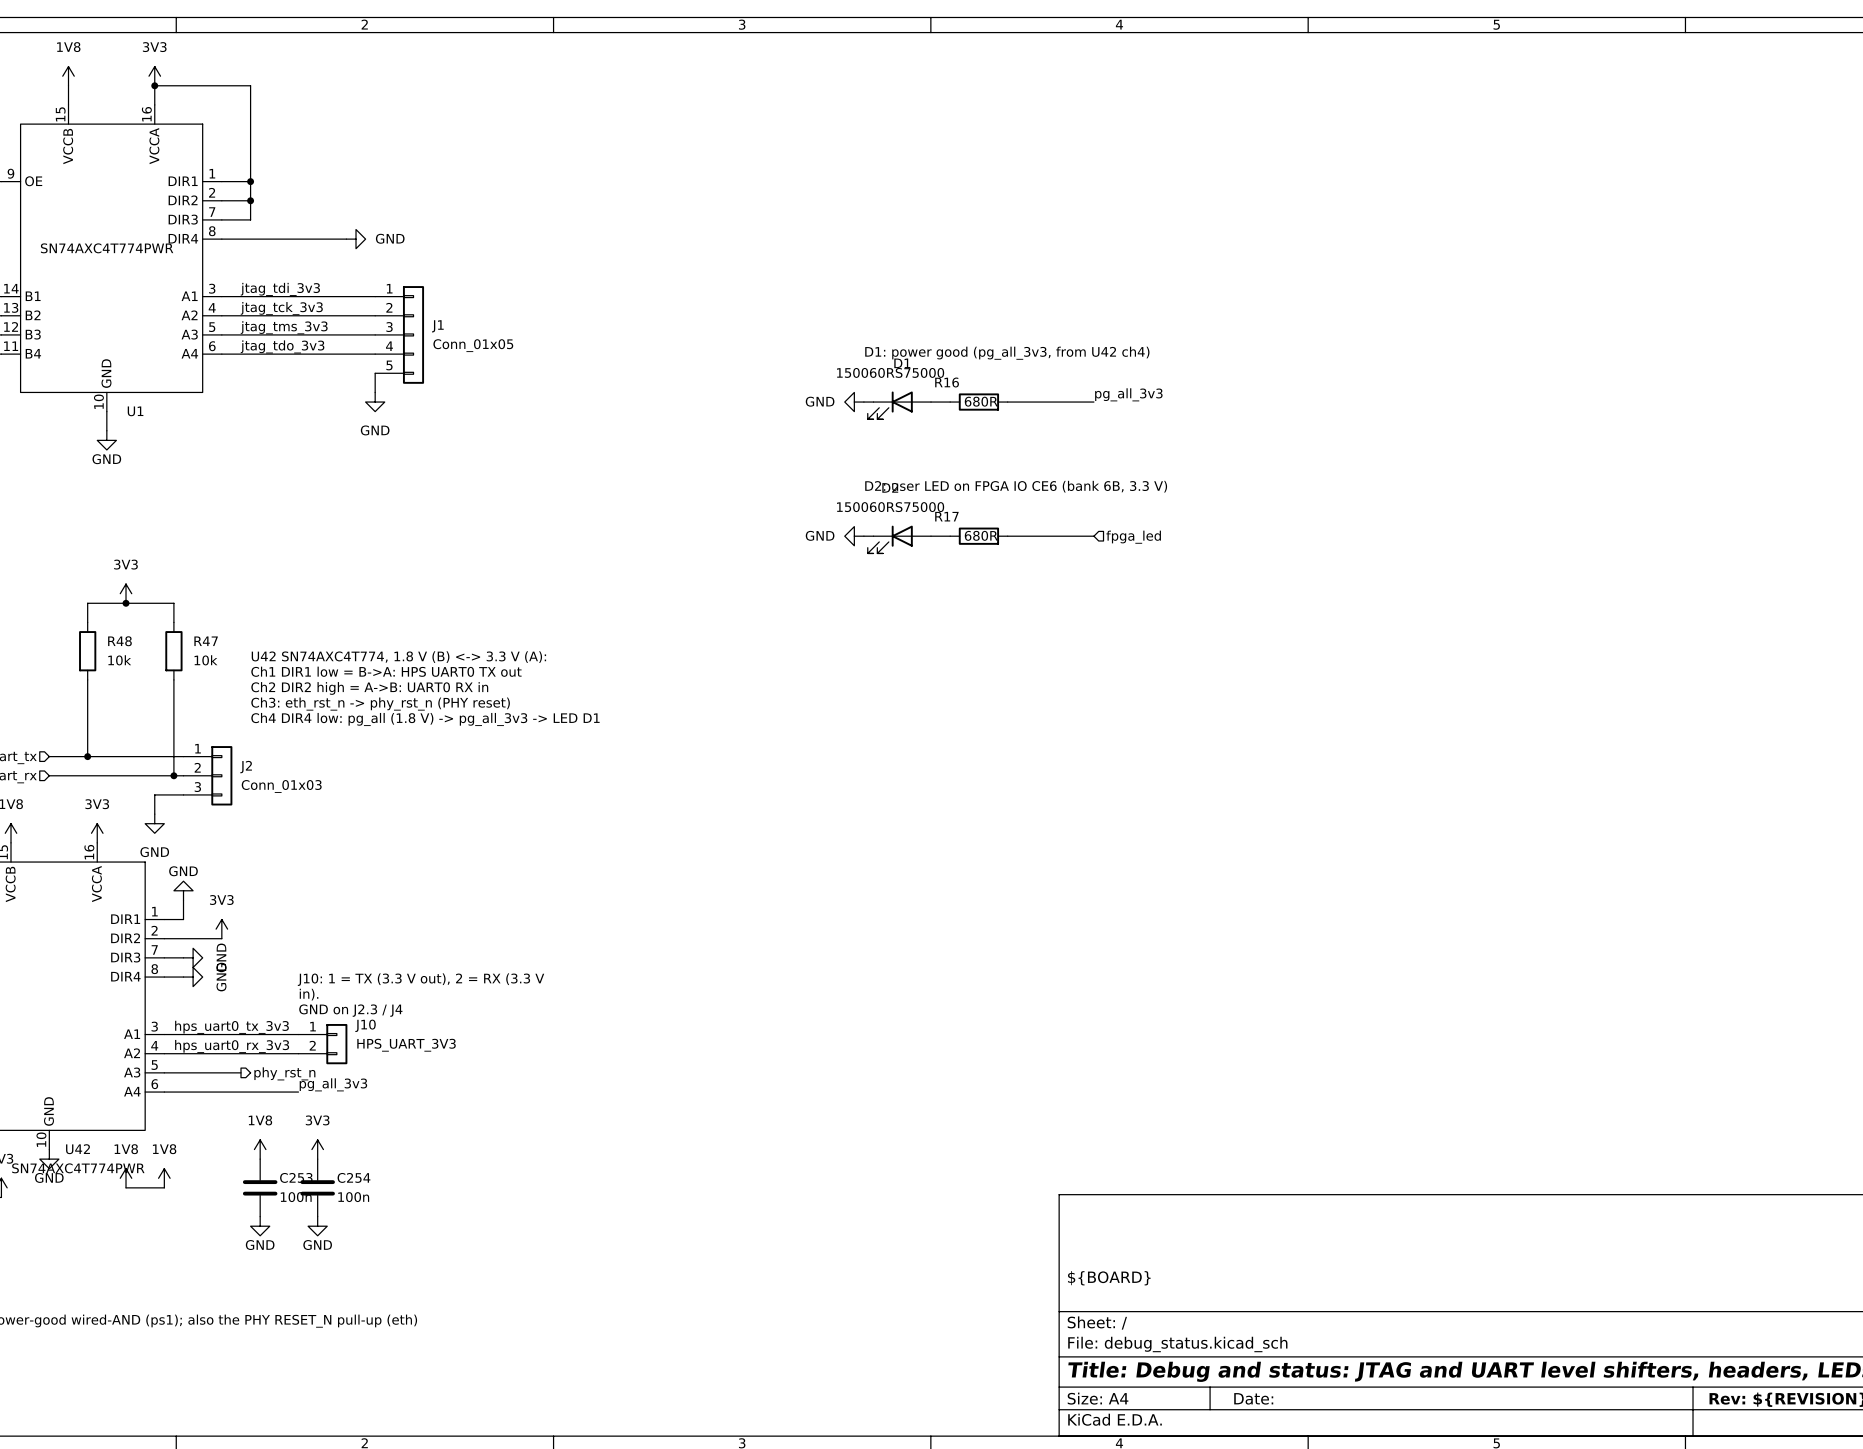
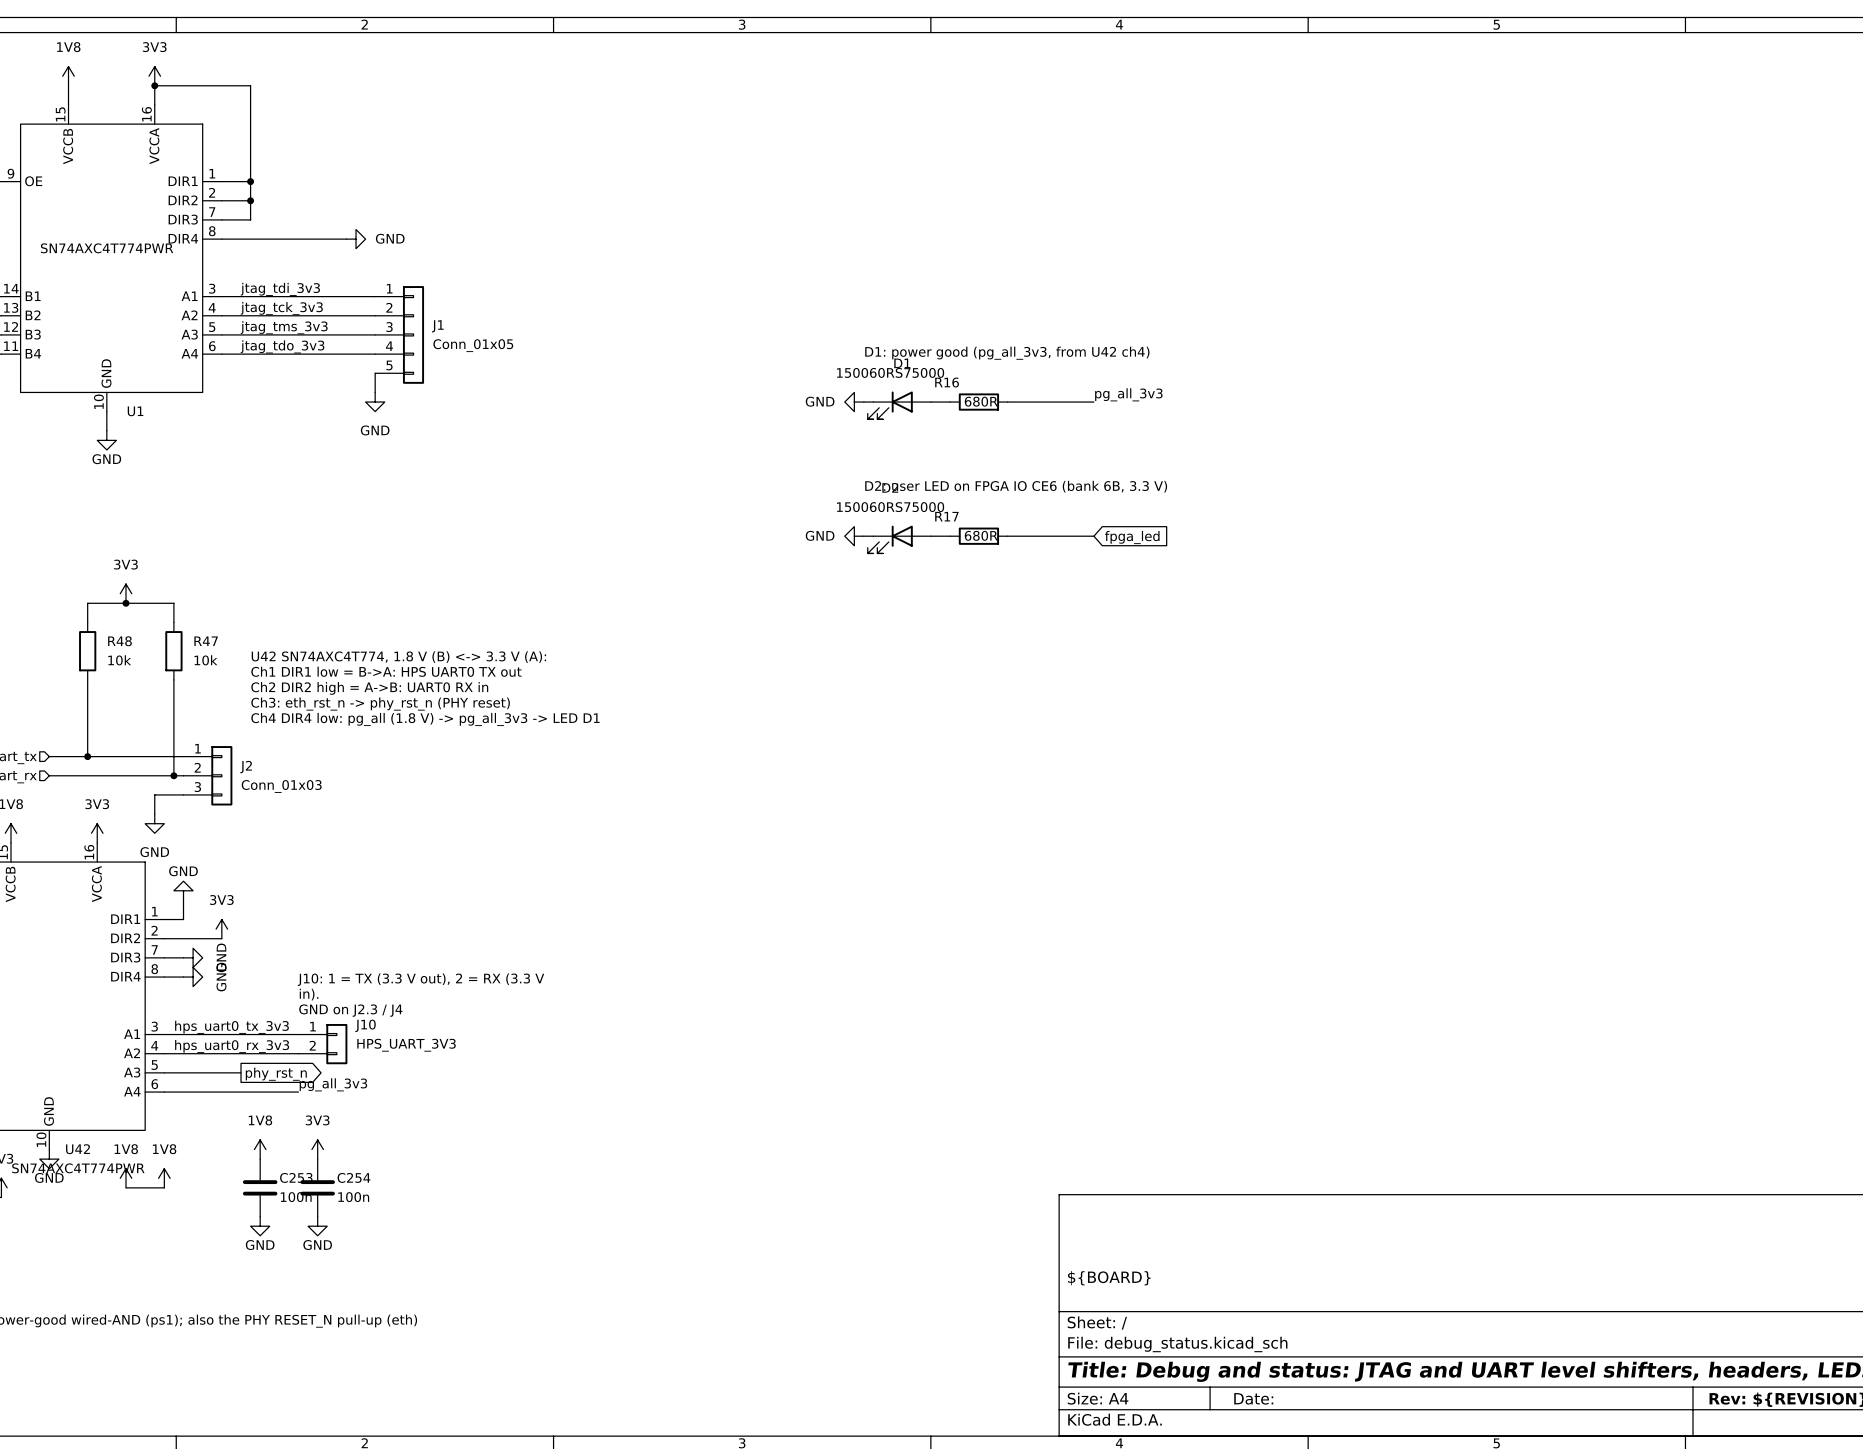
global label: none -> fpga_led (1132, 537)
hierarchical label: fpga_led (1133, 537) -> none
hierarchical label: phy_rst_n (284, 1073) -> none
global label: none -> phy_rst_n (276, 1074)

